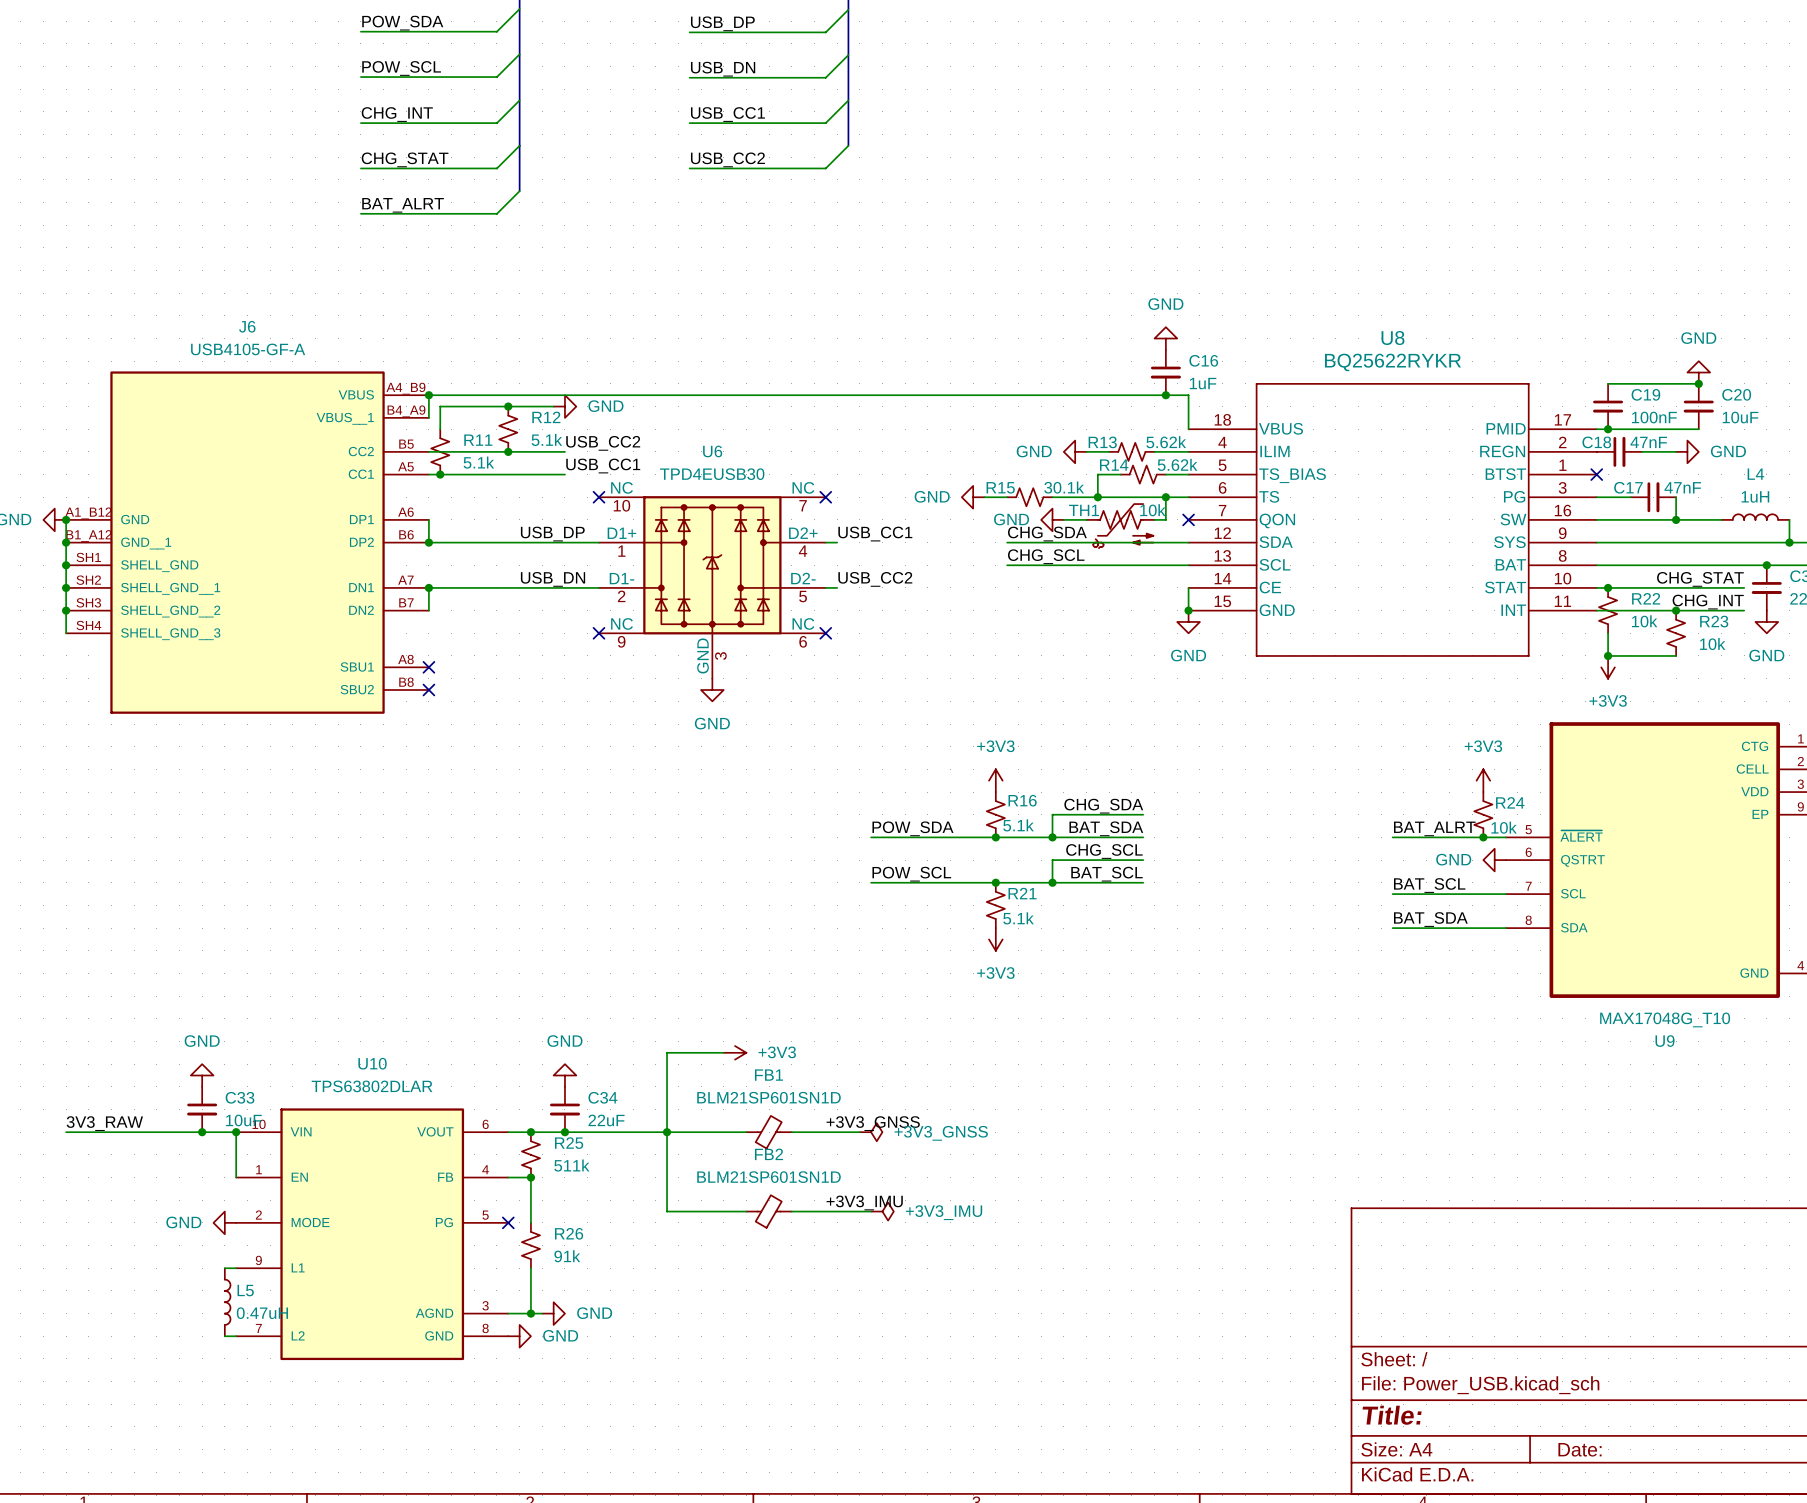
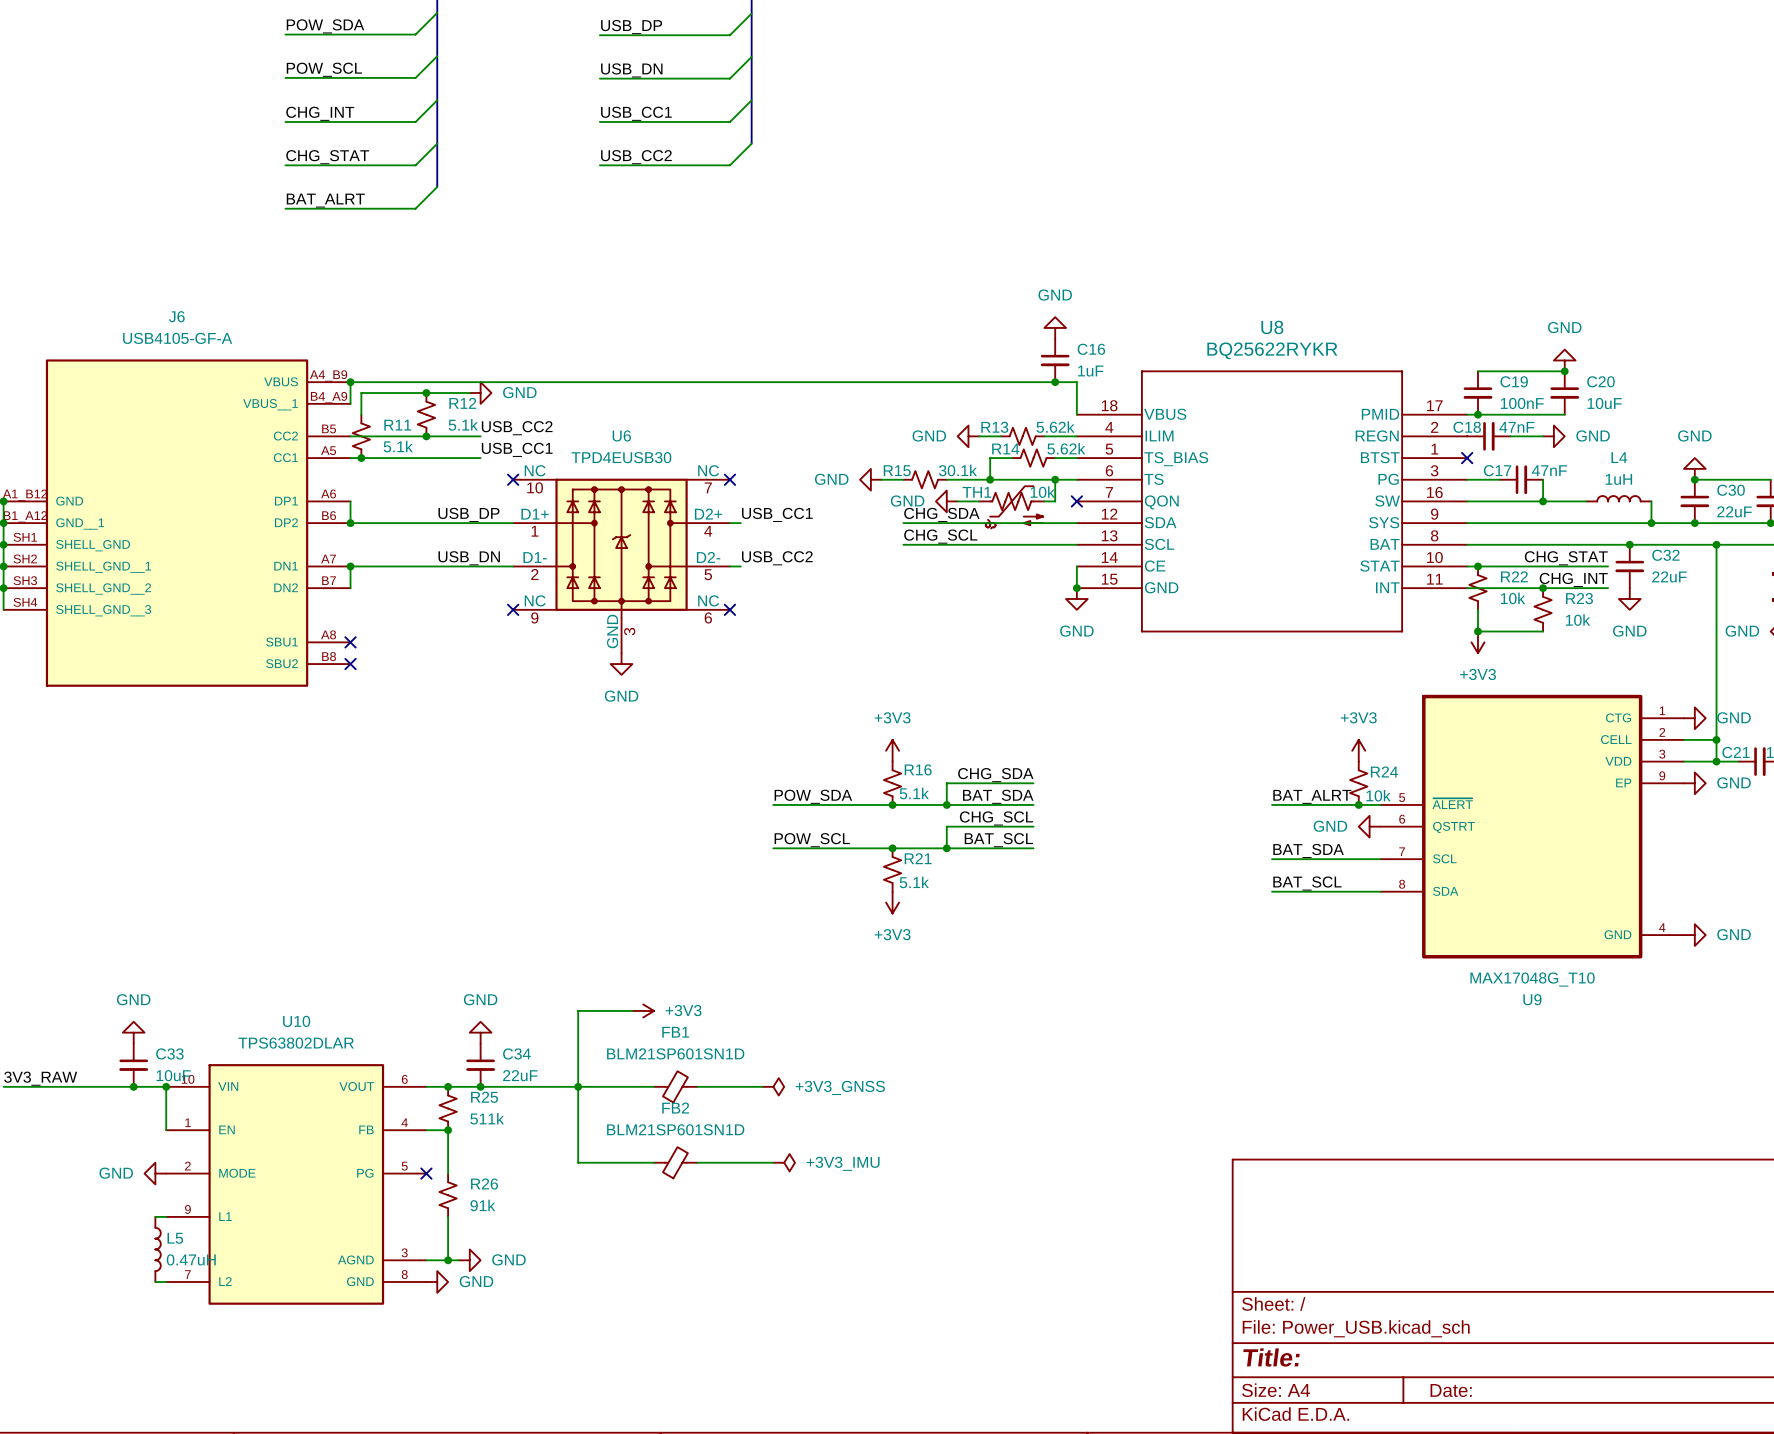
label: BAT_SCL (1429, 885) -> BAT_SDA (1308, 850)
label: BAT_SDA (1430, 919) -> BAT_SCL (1307, 883)
label: +3V3_GNSS (873, 1123) -> none
label: +3V3_IMU (864, 1202) -> none

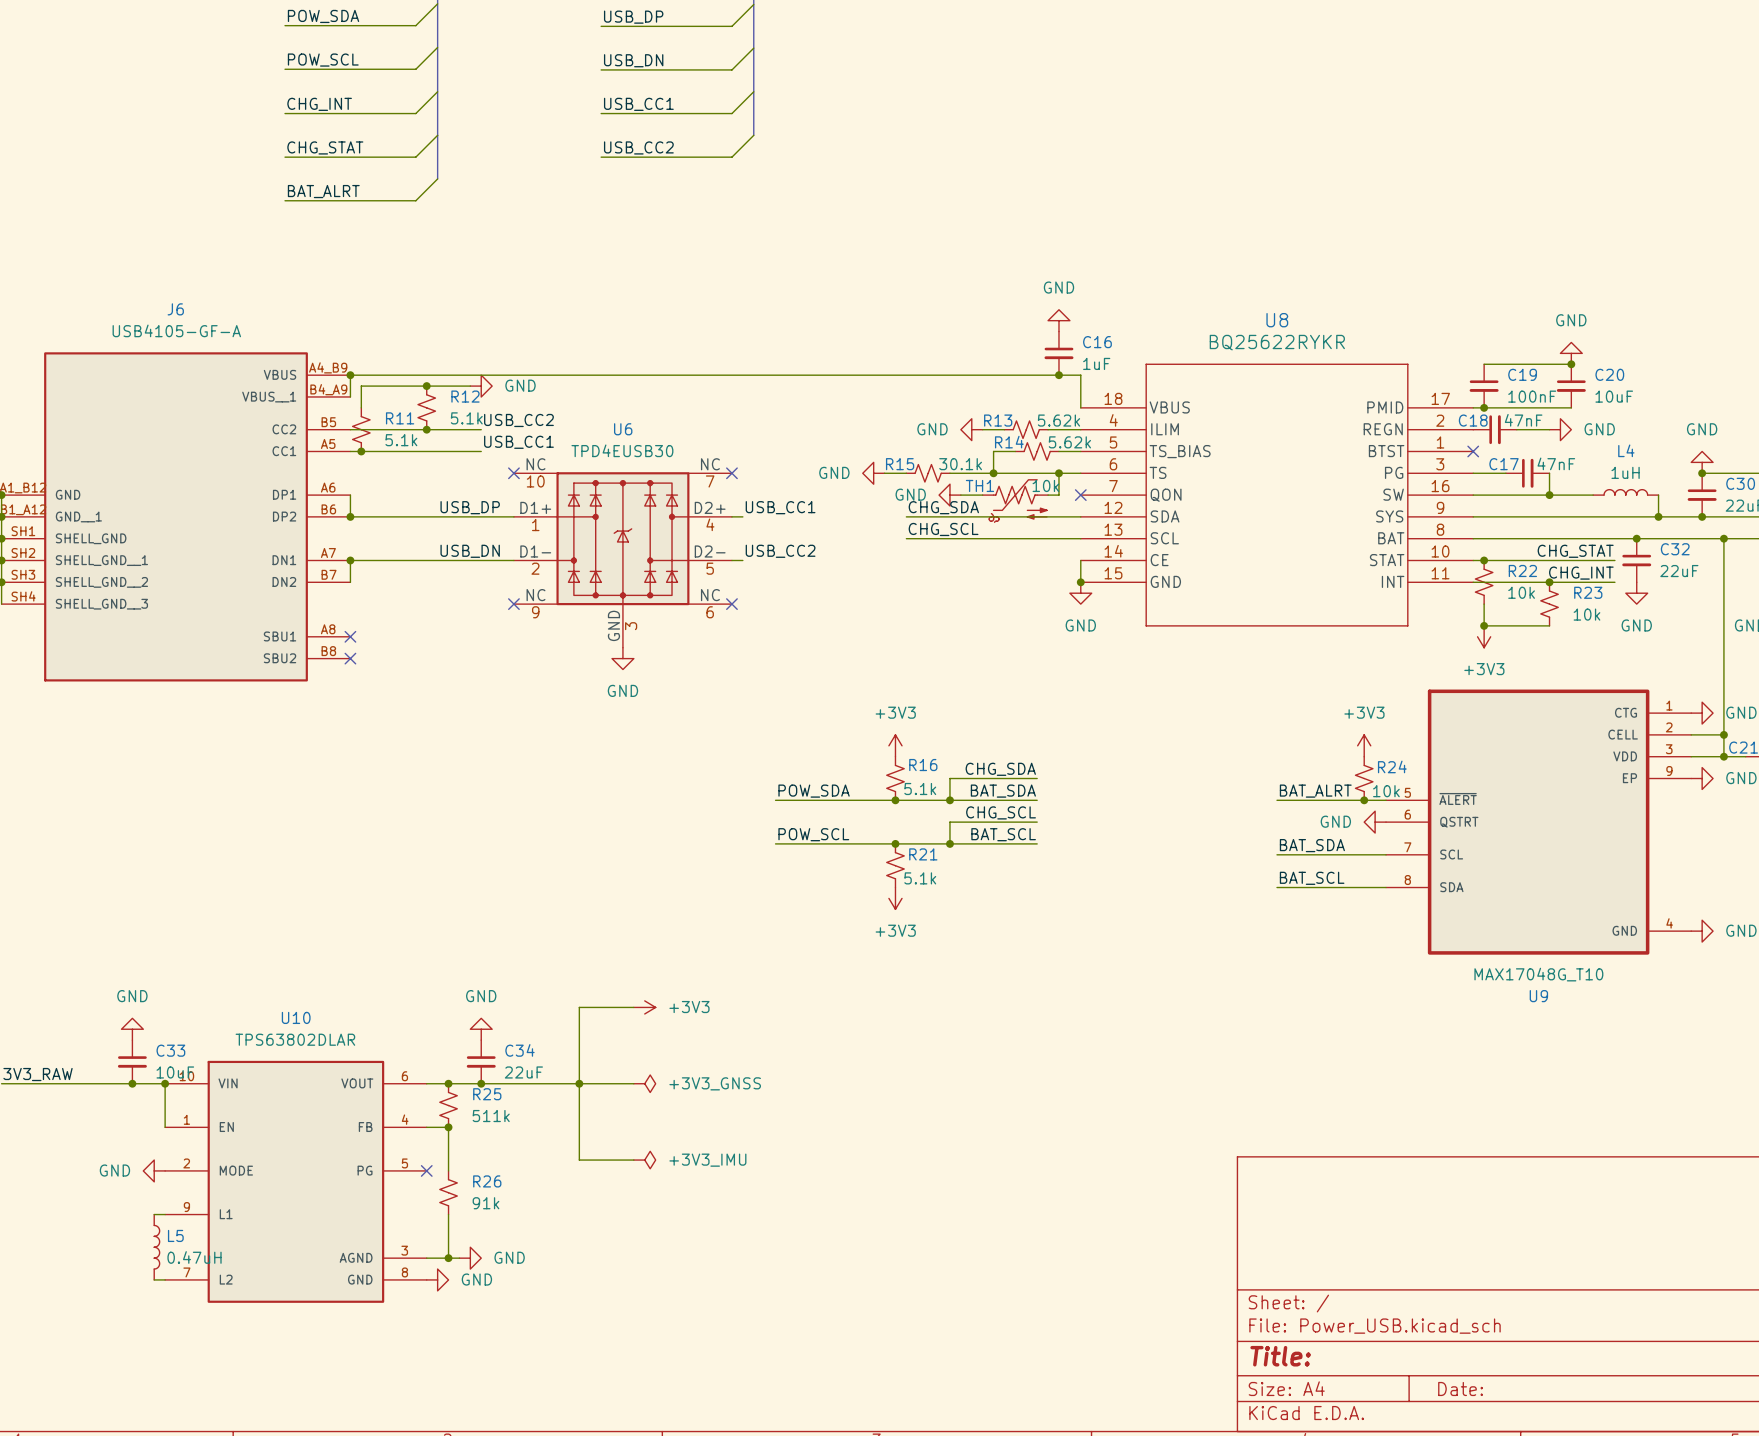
FB1: BLM21SP601SN1D (675, 1086) -> none
wire: (697, 1086) (762, 1086) -> none
power symbol position: +3V3_GNSS (773, 1086) -> +3V3_GNSS (644, 1083)
FB2: BLM21SP601SN1D (675, 1162) -> none
wire: (697, 1162) (773, 1162) -> none
power symbol position: +3V3_IMU (784, 1162) -> +3V3_IMU (644, 1160)

